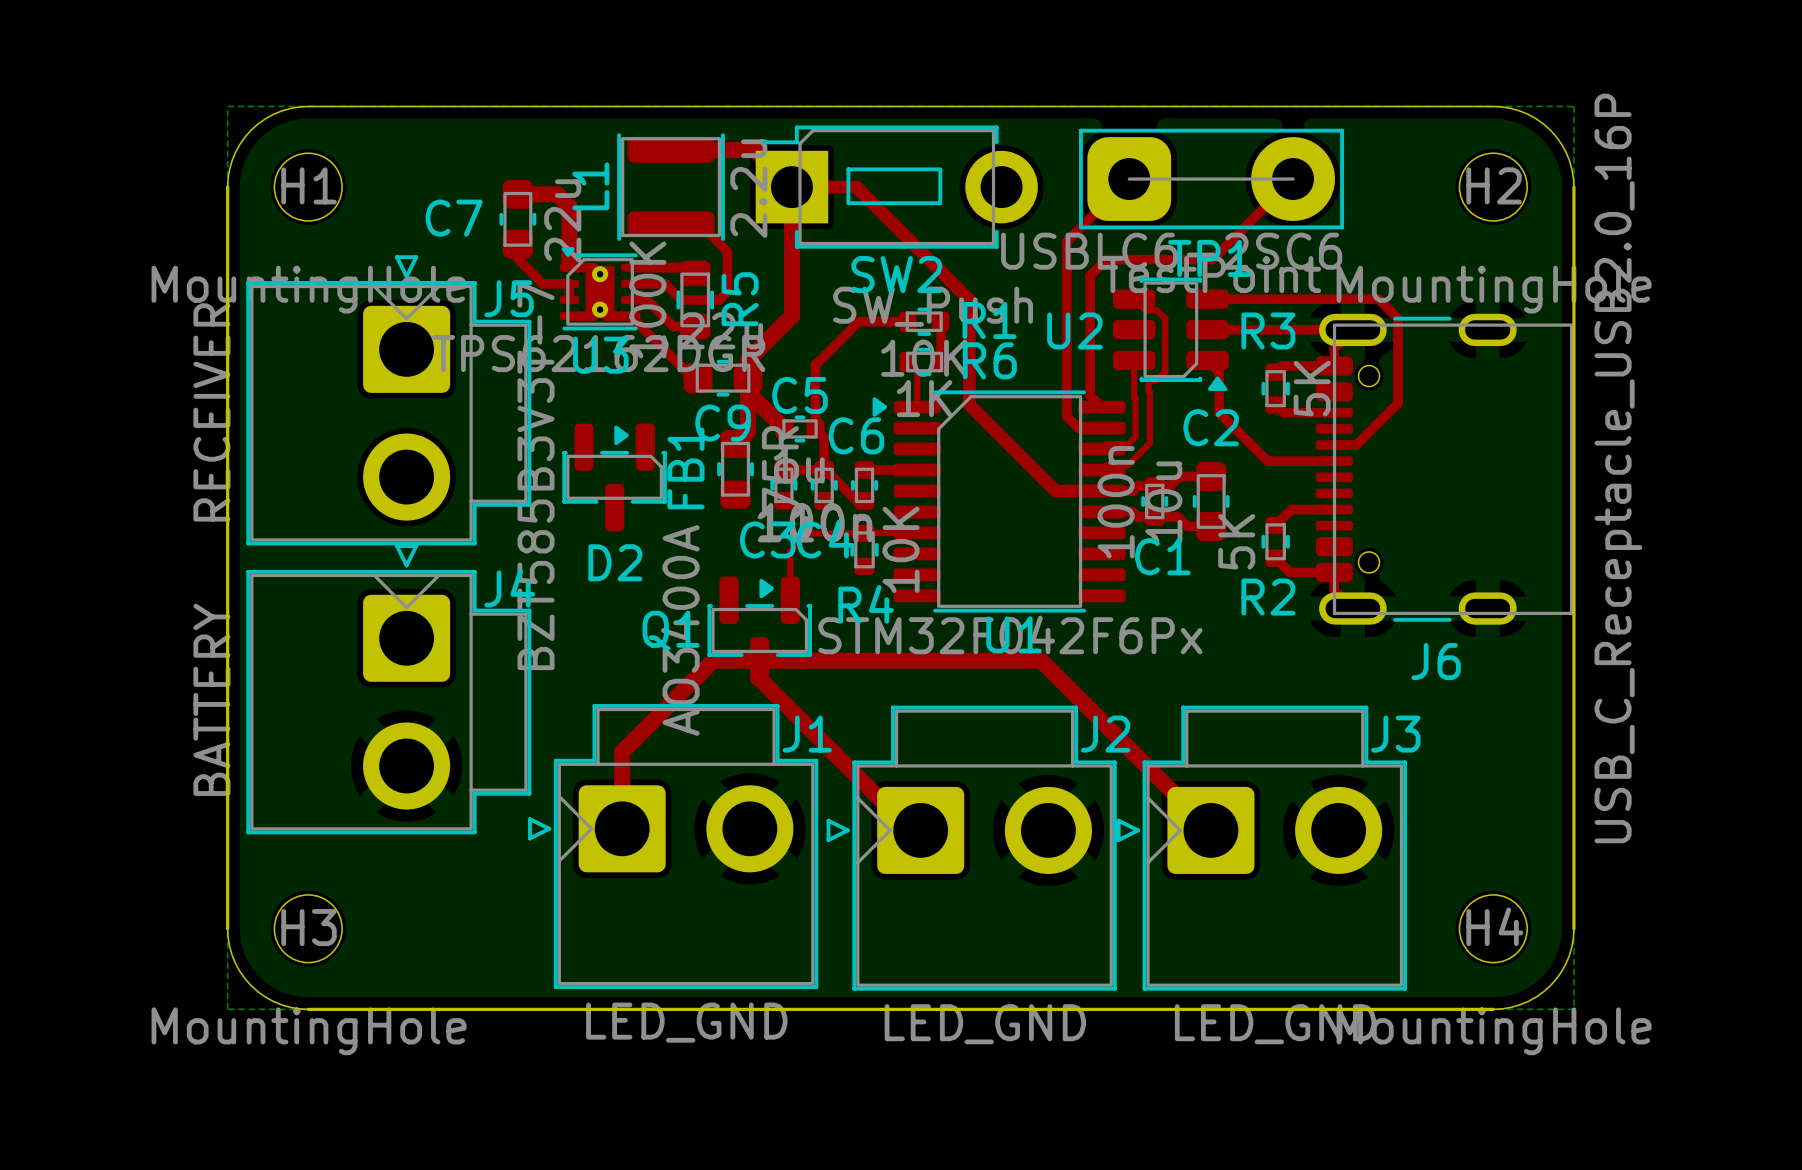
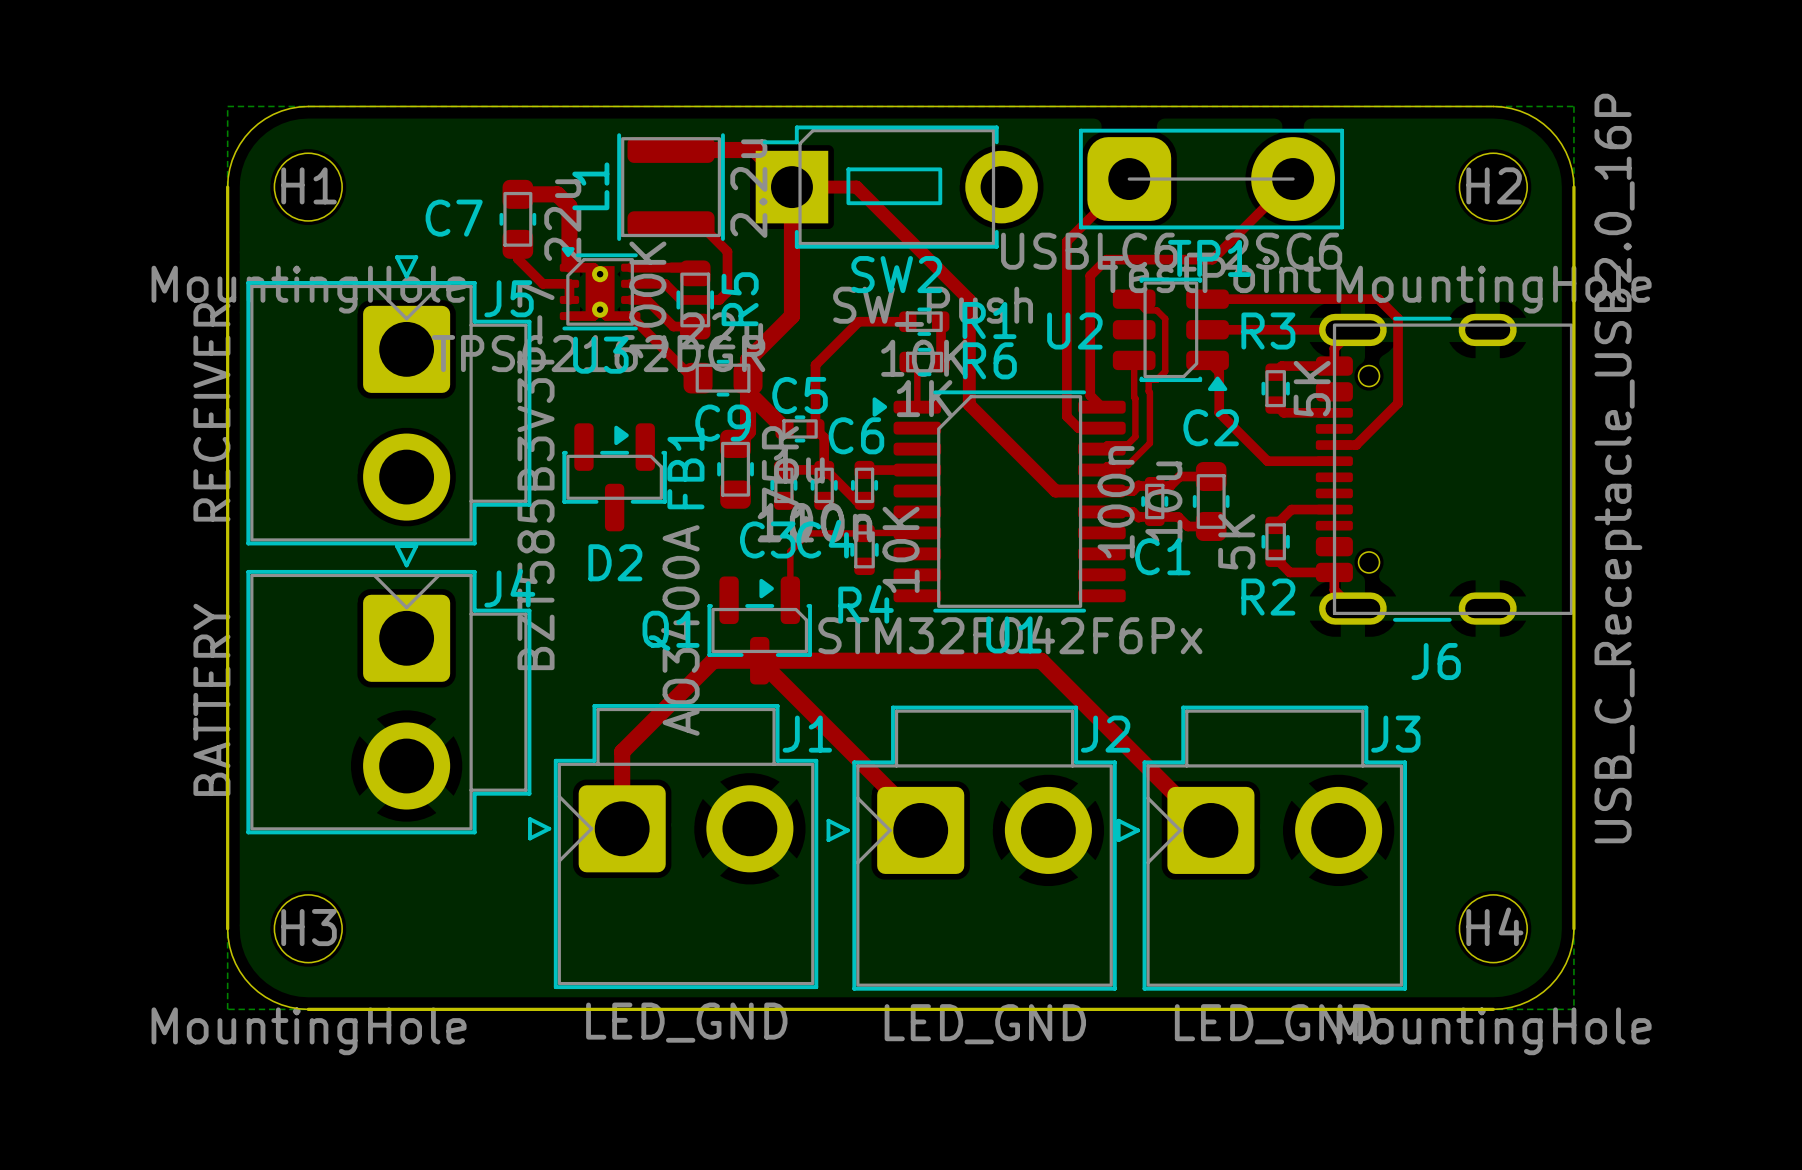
top track: (759, 660) (759, 678) (911, 830) (920, 830) -> (759, 660) (920, 821) (920, 830)

